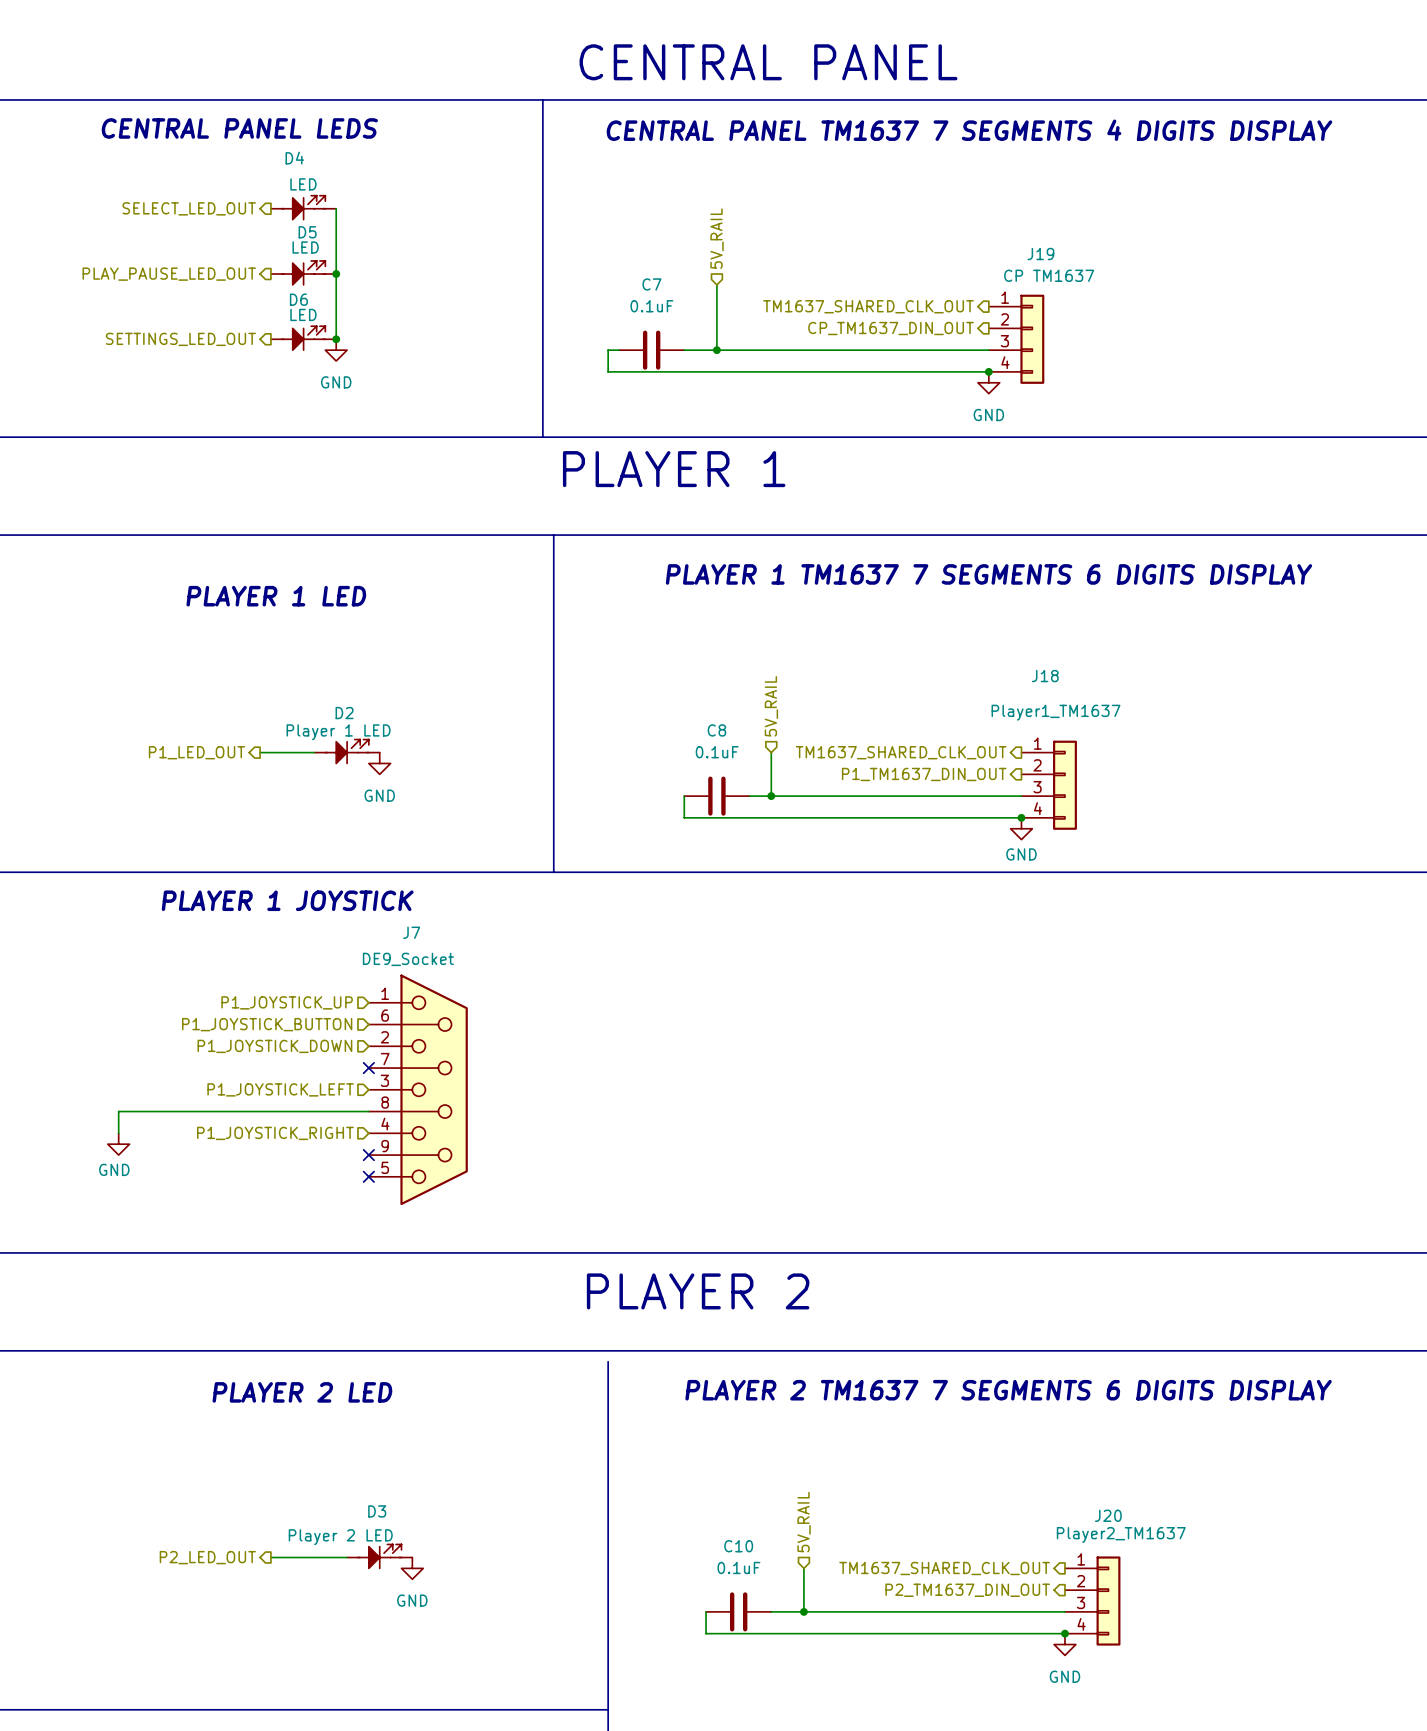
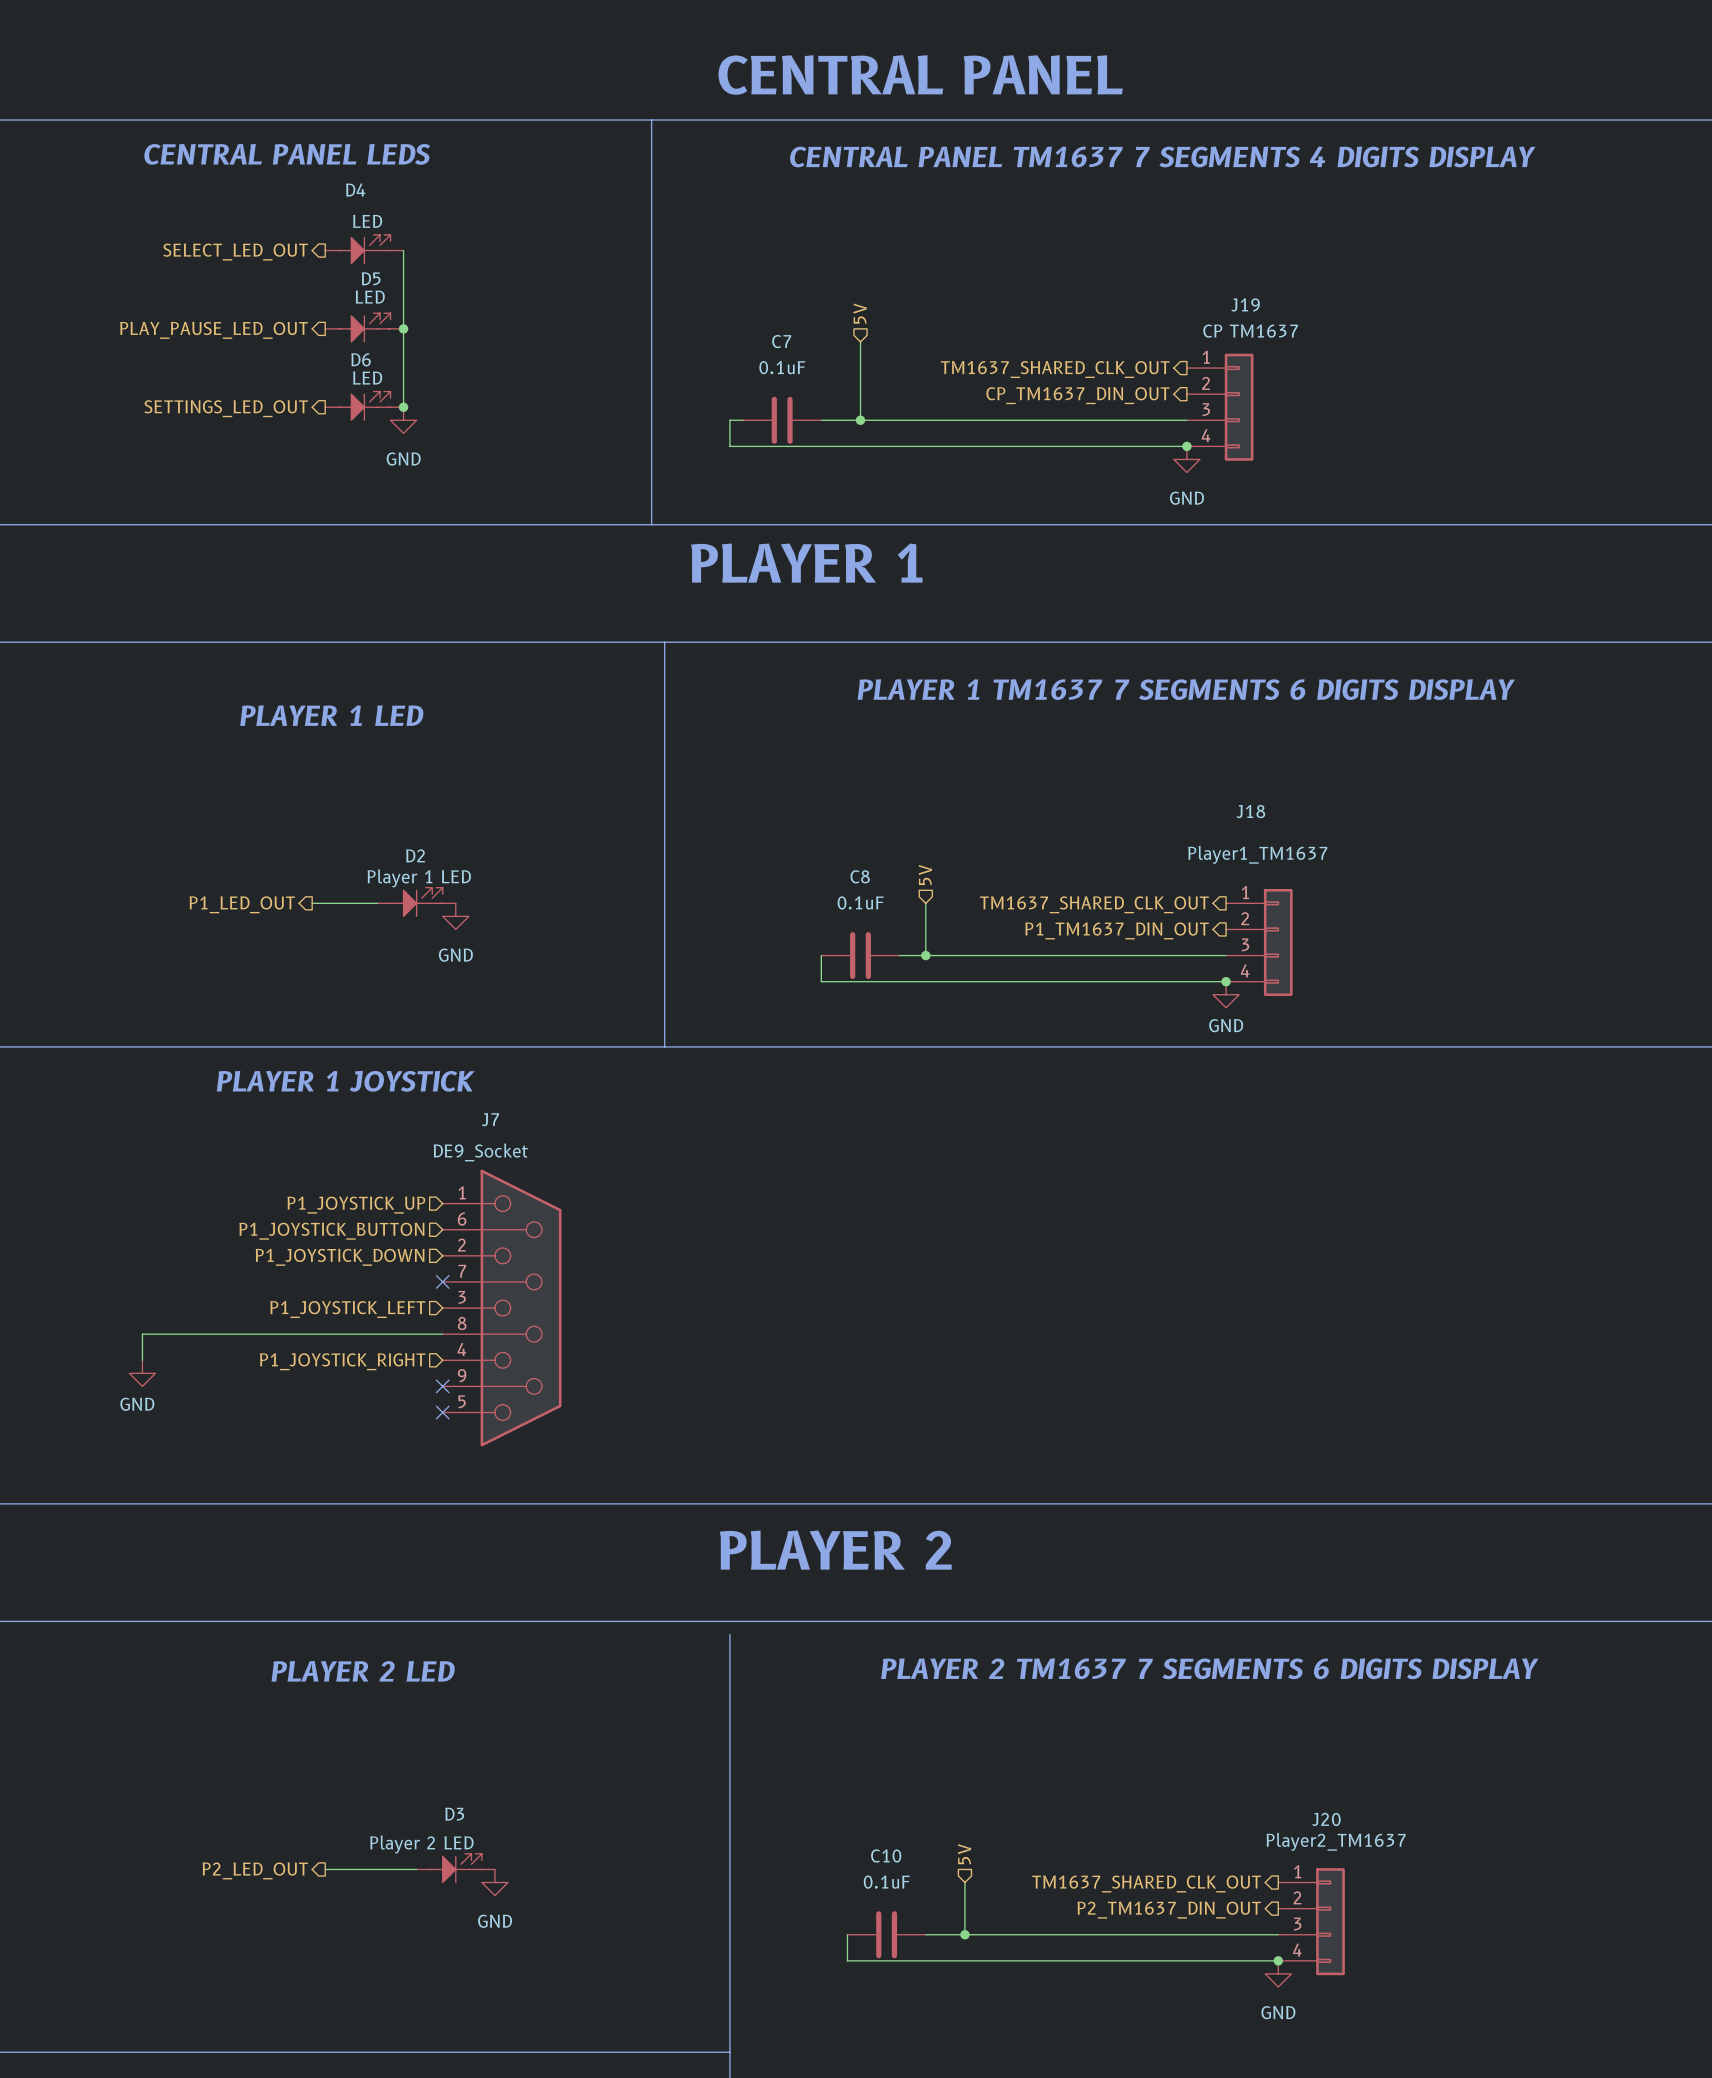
hierarchical label: 5V_RAIL (717, 238) -> 5V (860, 313)
hierarchical label: 5V_RAIL (771, 706) -> 5V (925, 874)
hierarchical label: 5V_RAIL (804, 1522) -> 5V (964, 1854)

